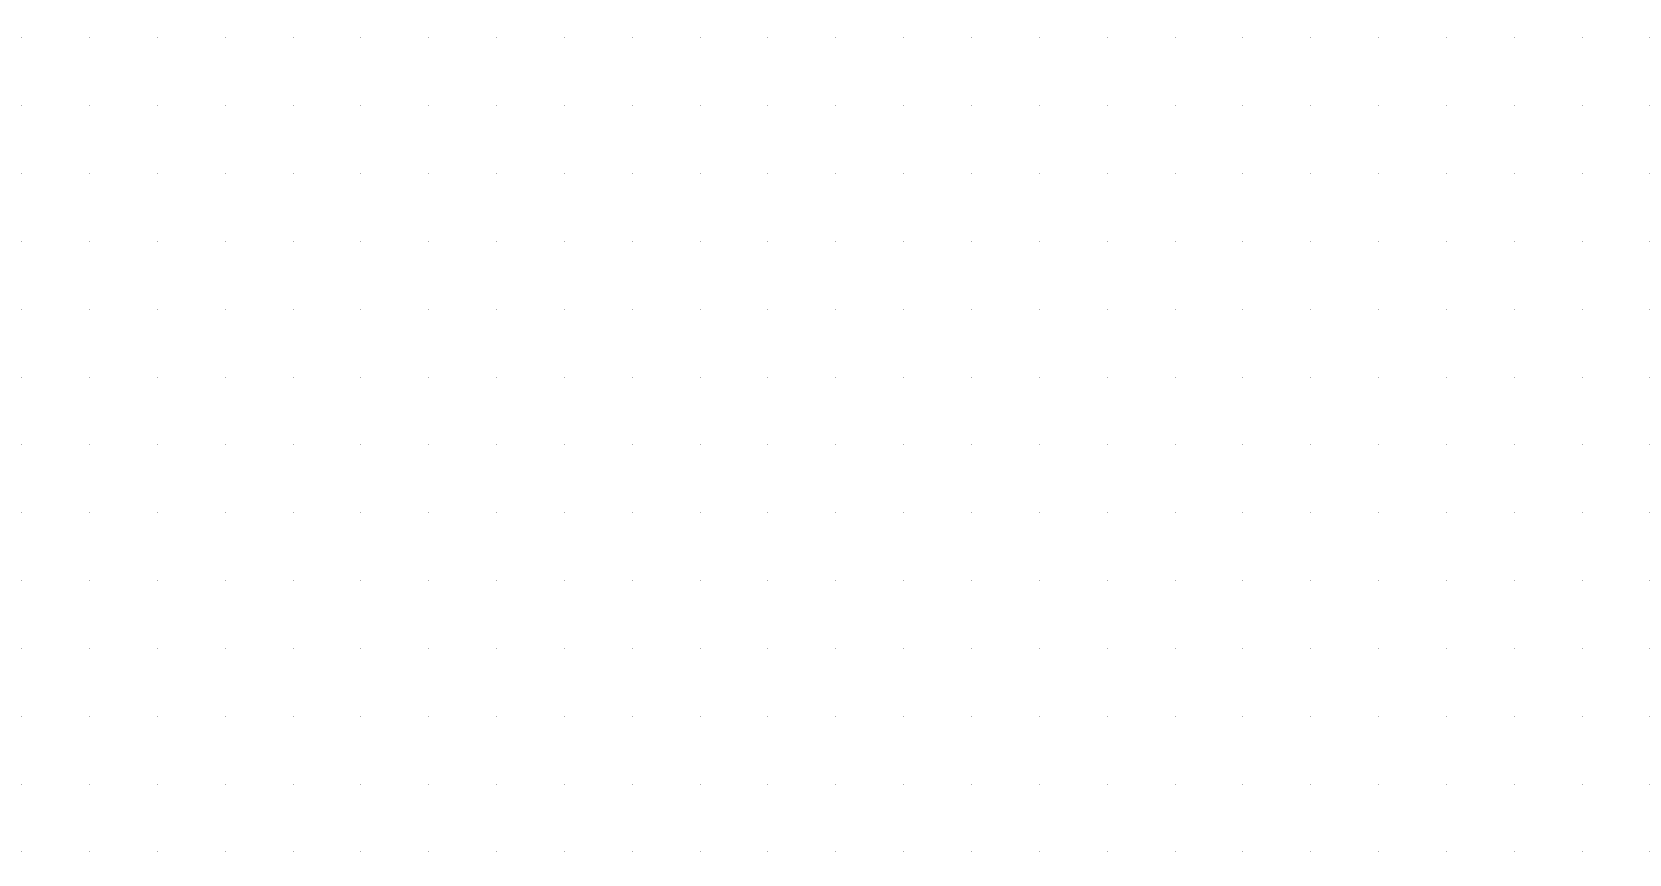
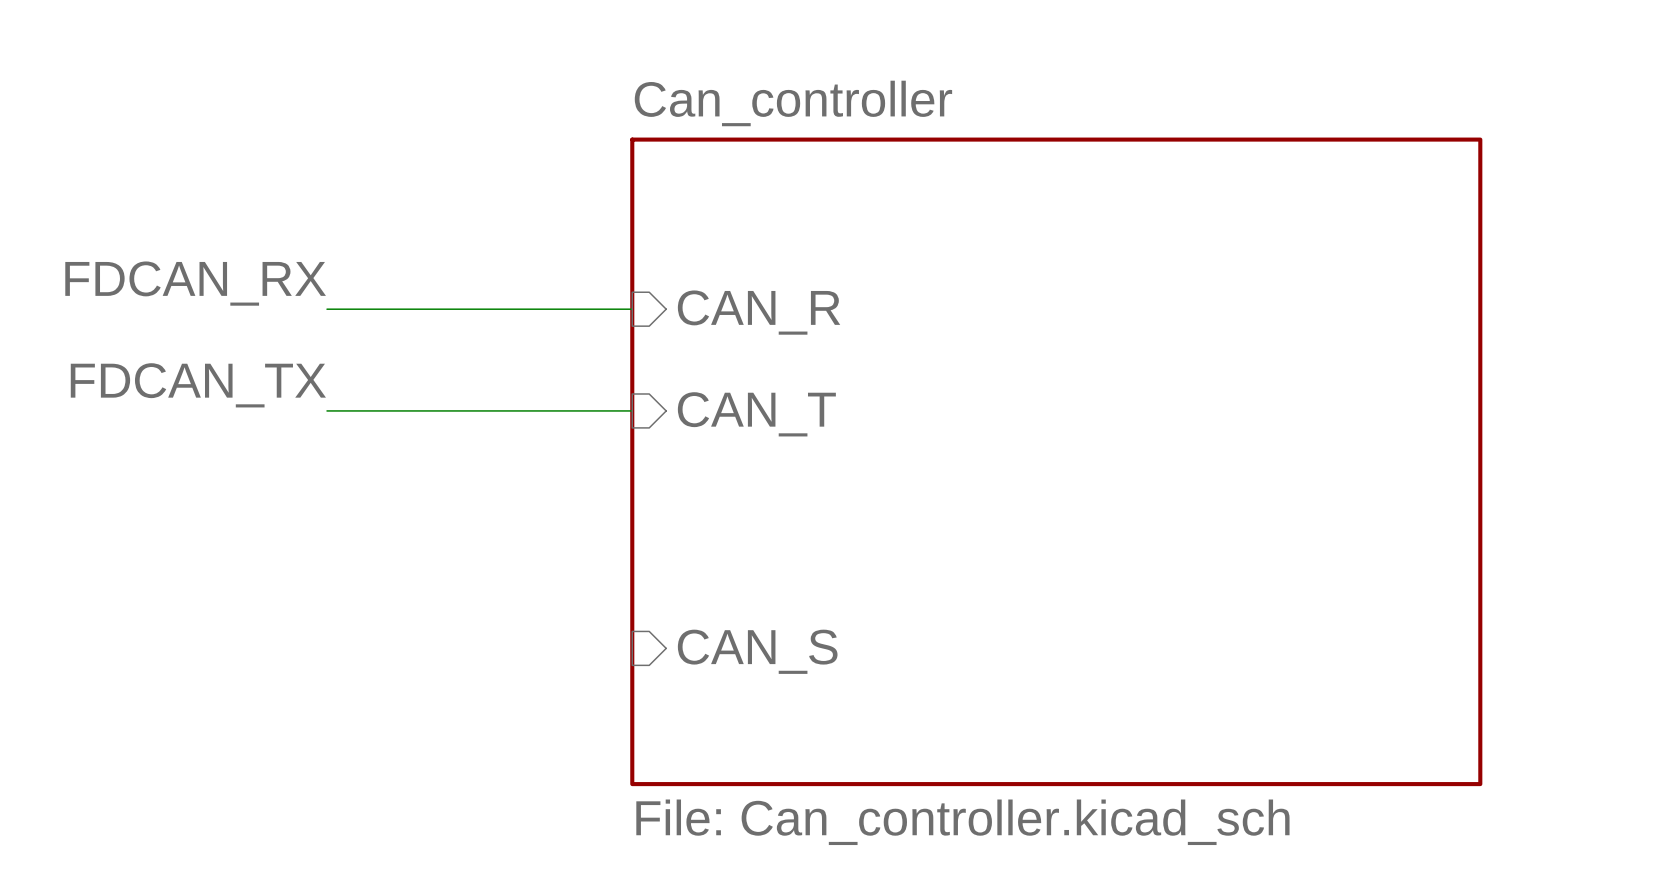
label: none -> FDCAN_RX (195, 283)
wire: none -> (326, 309) (632, 309)
sheet pin: none -> CAN_R (759, 312)
label: none -> FDCAN_TX (198, 385)
wire: none -> (326, 410) (632, 410)
sheet pin: none -> CAN_T (756, 414)
sheet Can_controller: none -> File: Can_controller.kicad_sch (1056, 461)
sheet pin: none -> CAN_S (757, 651)

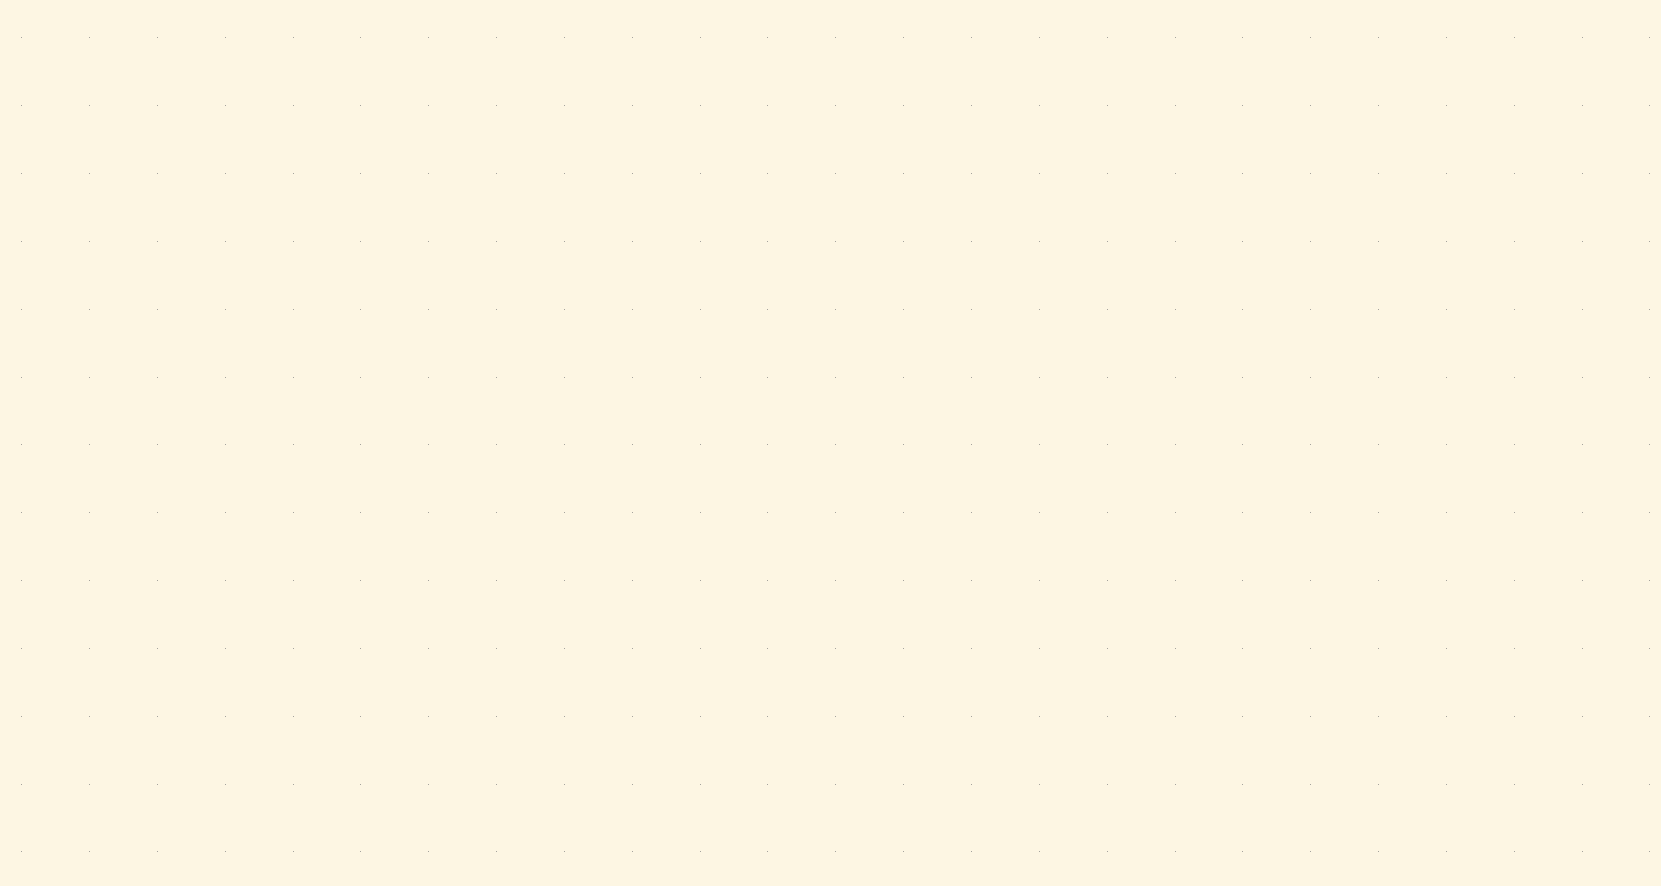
label: FDCAN_RX (195, 283) -> none
wire: (326, 309) (632, 309) -> none
sheet pin: CAN_R (759, 312) -> none
label: FDCAN_TX (198, 385) -> none
wire: (326, 410) (632, 410) -> none
sheet pin: CAN_T (756, 414) -> none
sheet Can_controller: File: Can_controller.kicad_sch (1056, 461) -> none
sheet pin: CAN_S (757, 651) -> none

